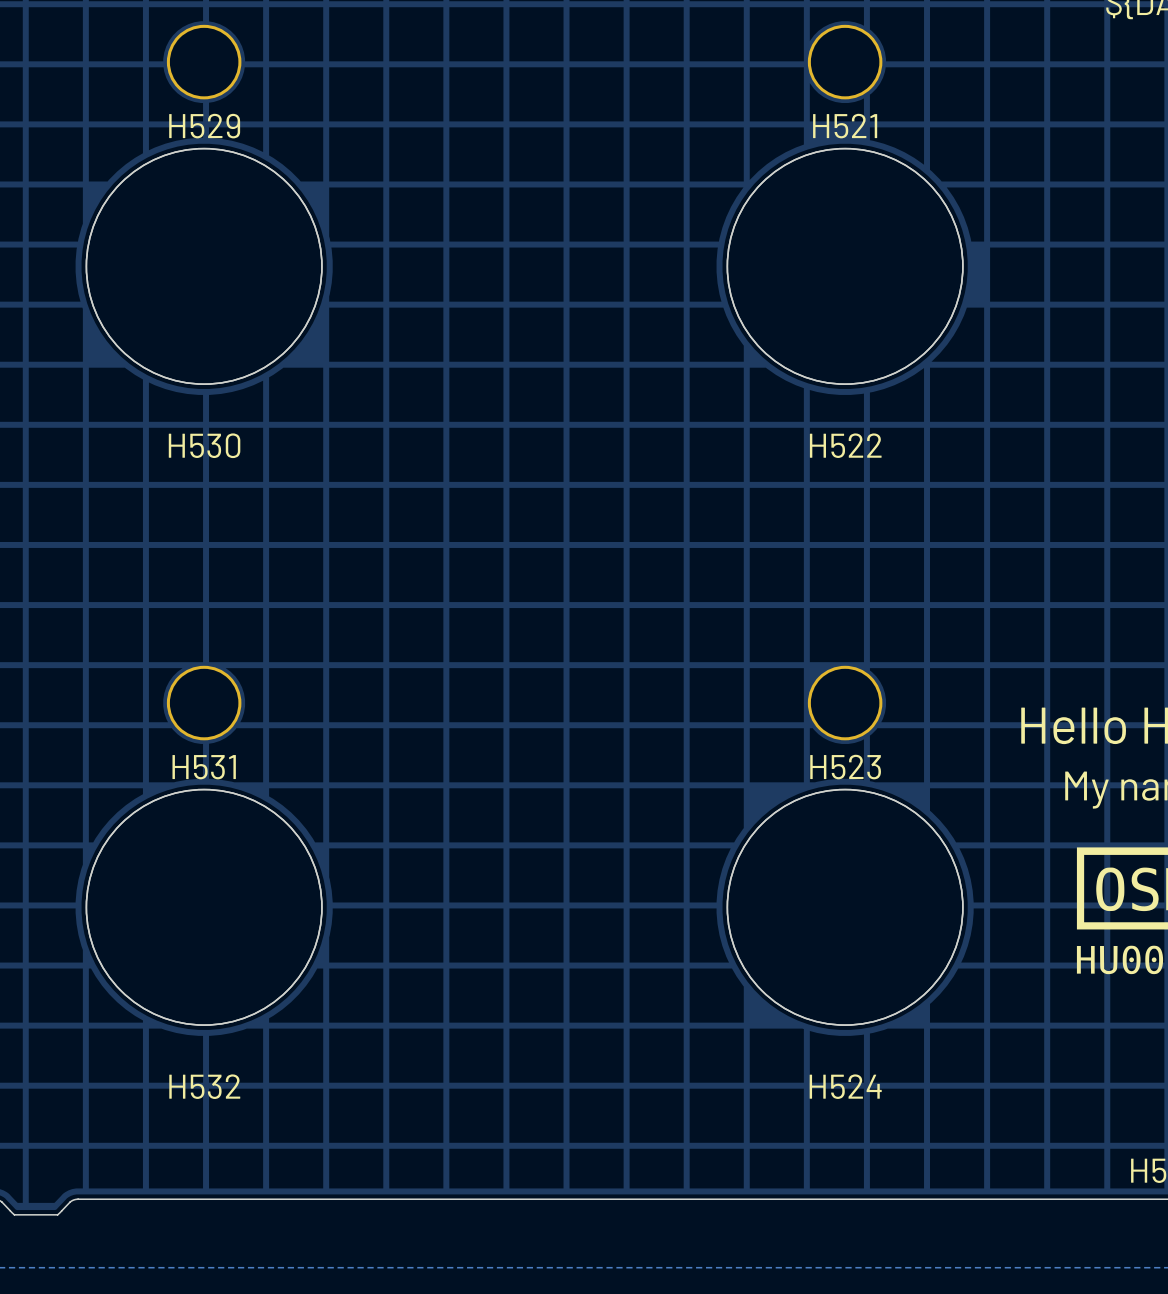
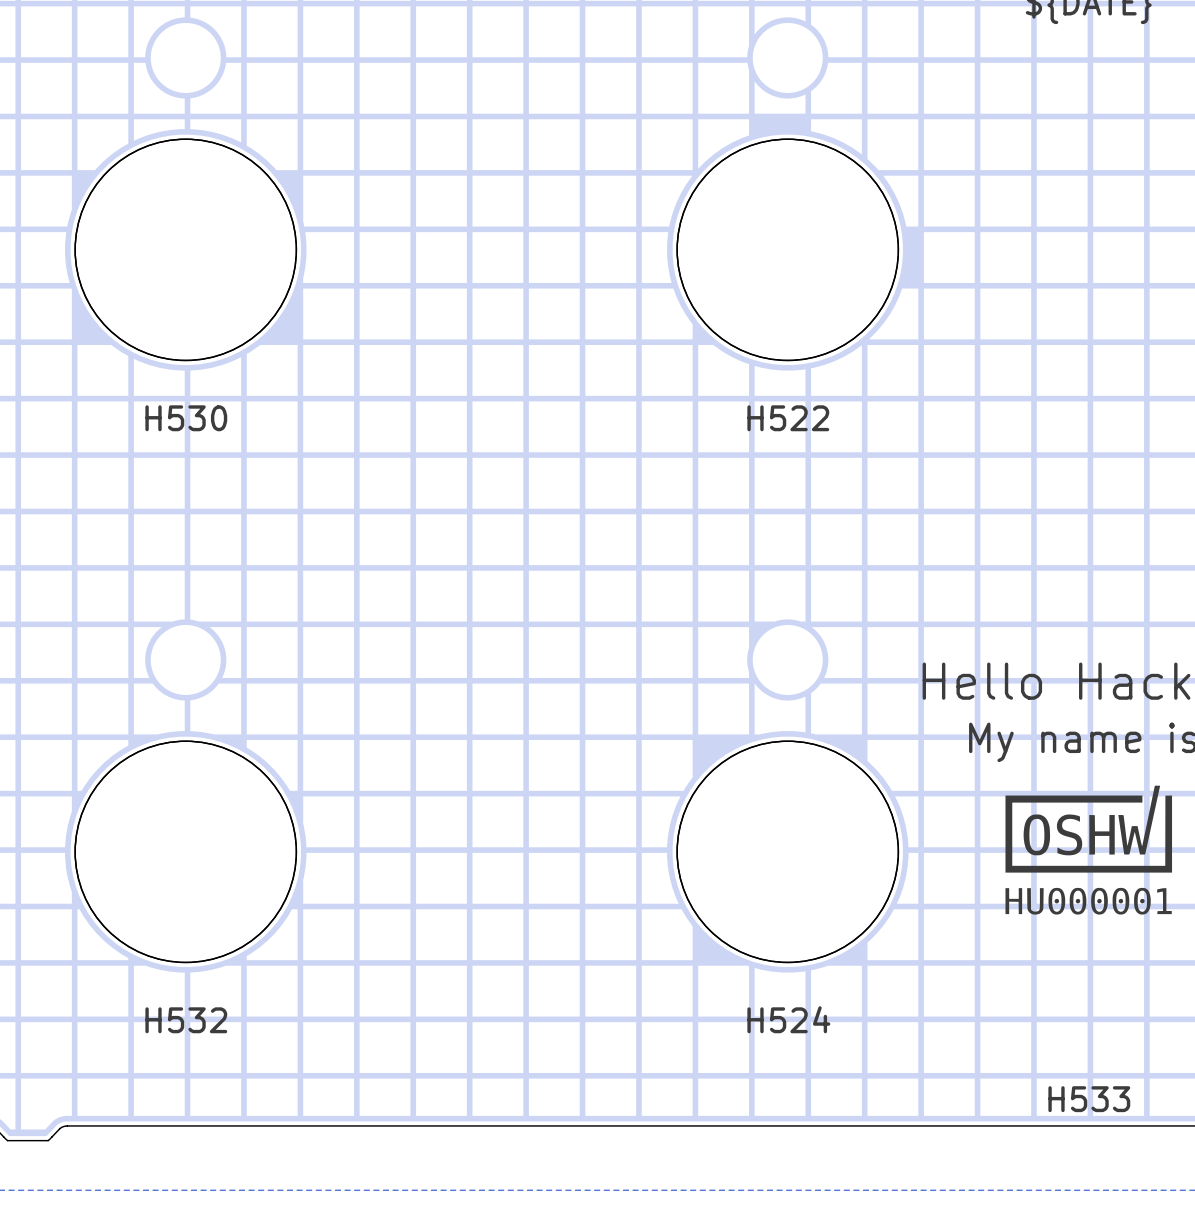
H529: (204, 62) -> none
H521: (845, 62) -> none
H531: (204, 703) -> none
H523: (845, 703) -> none

